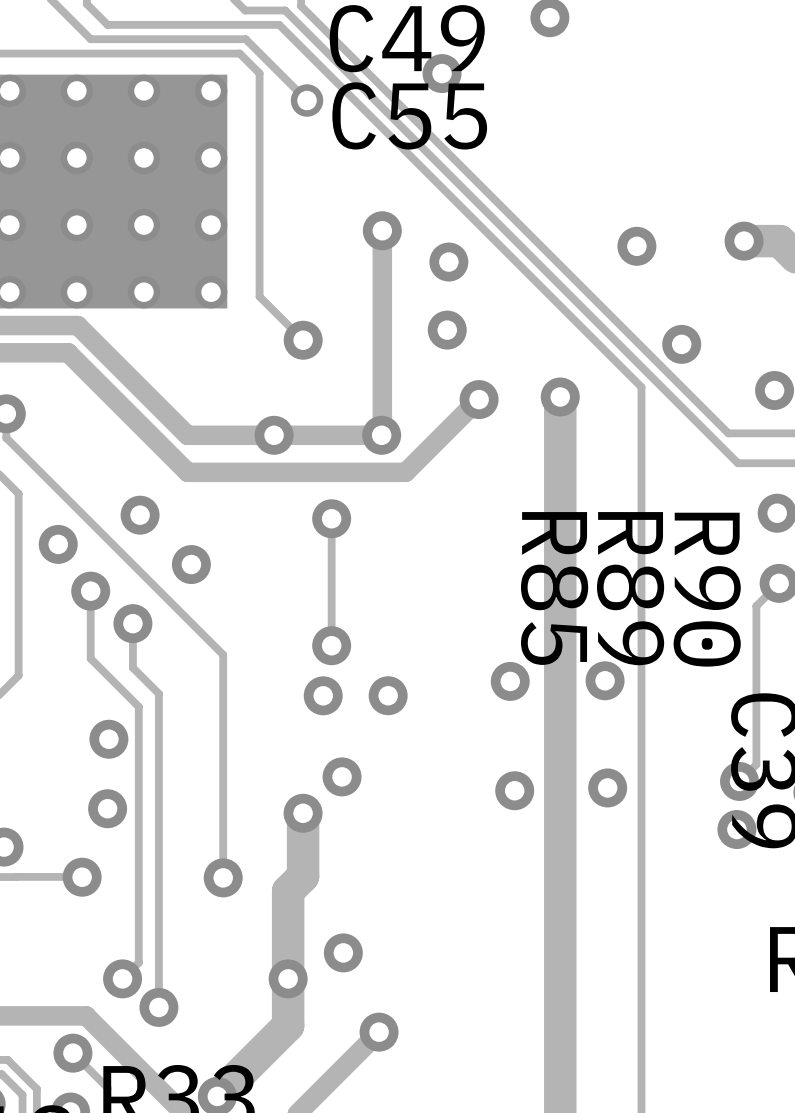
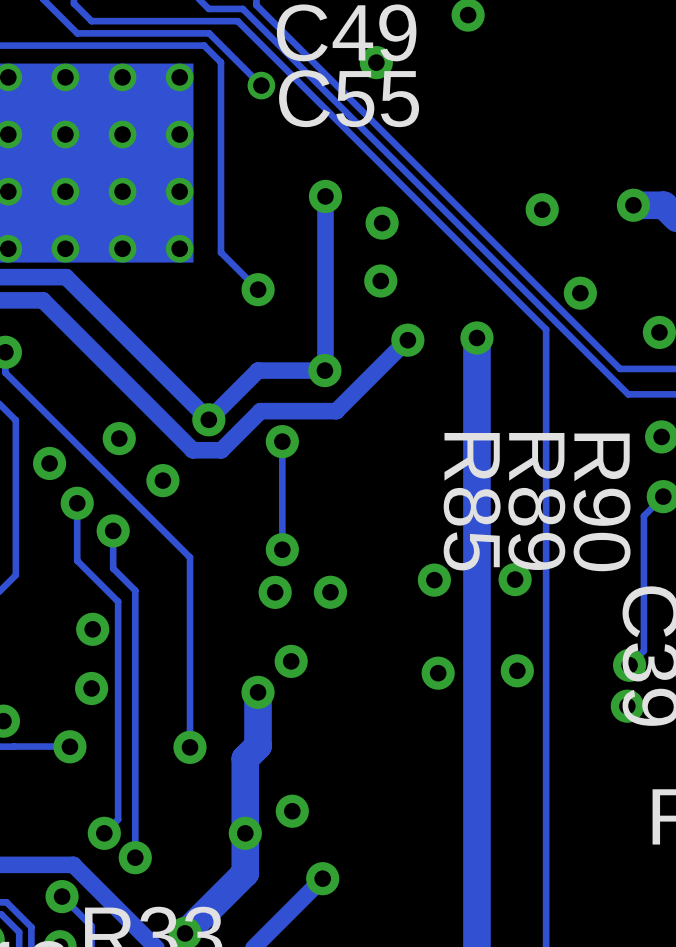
track: (50, 352) (68, 352) (187, 472) (405, 472) -> (42, 300) (192, 450) (221, 450) (260, 411) (336, 411) (345, 402)
via position: (274, 435) -> (208, 419)
track: (303, 435) (187, 435) -> (258, 370) (208, 419) (159, 370)

